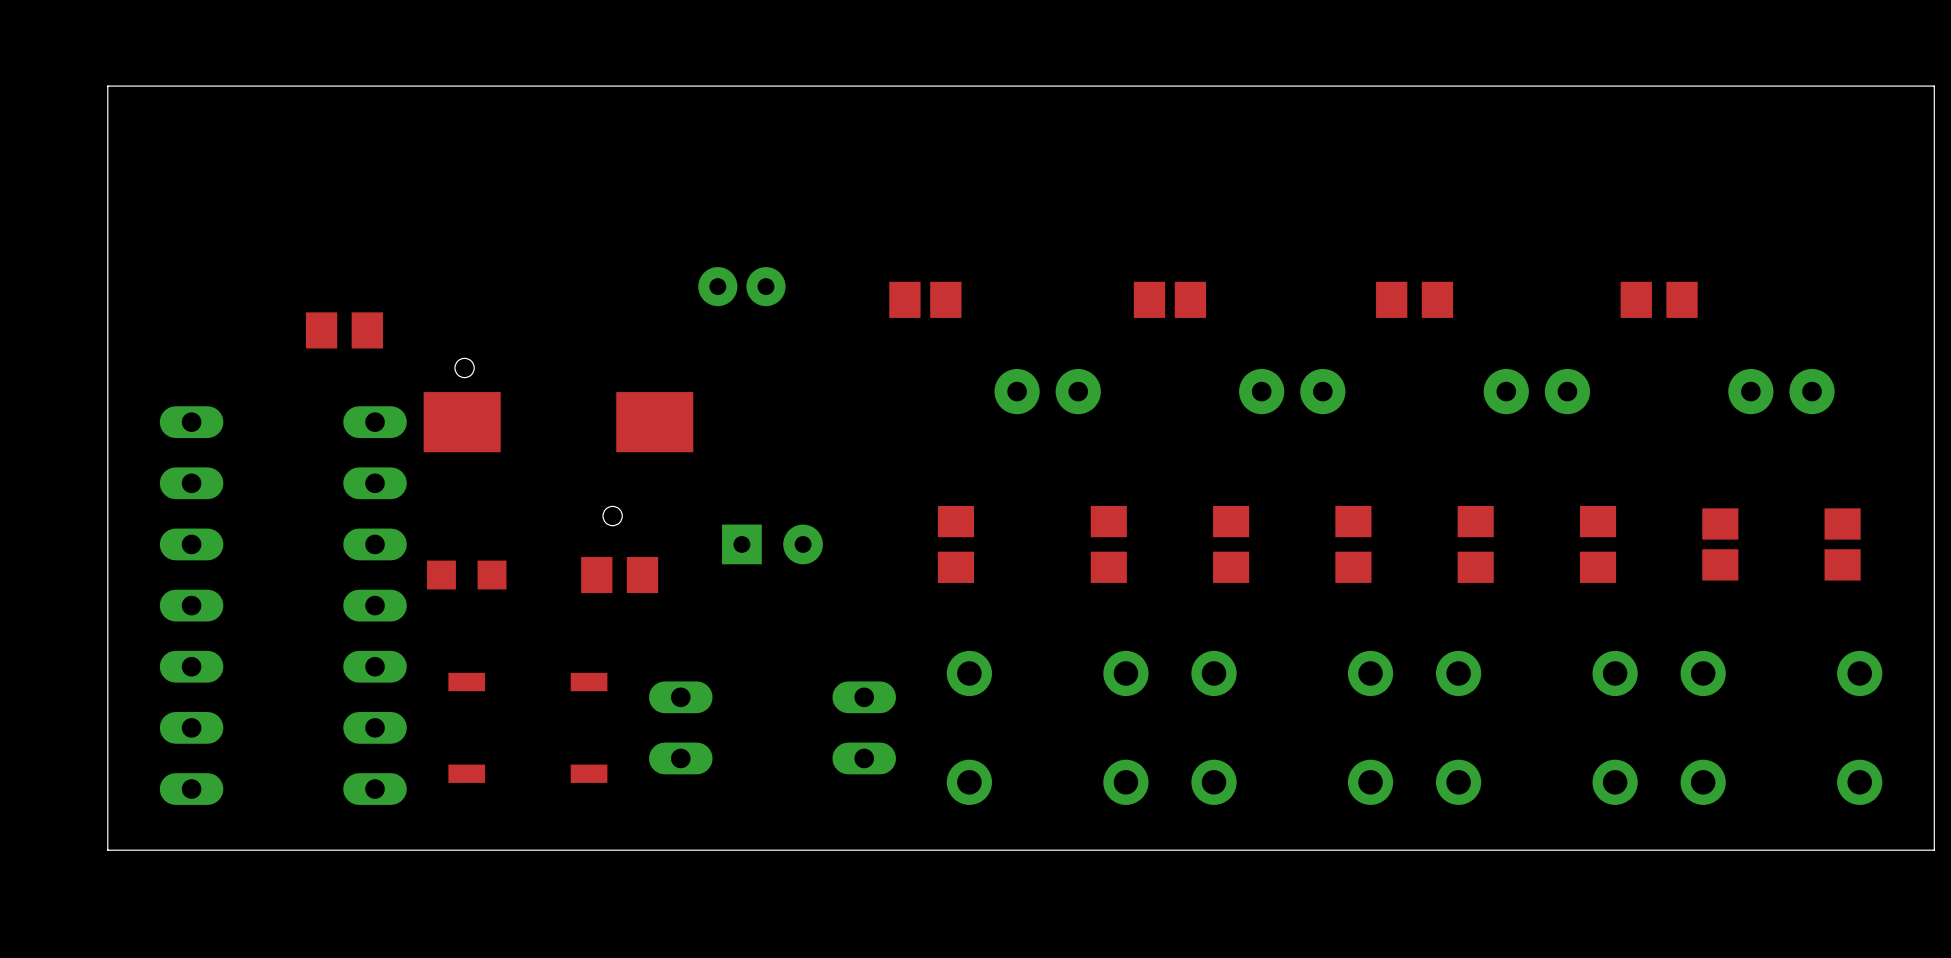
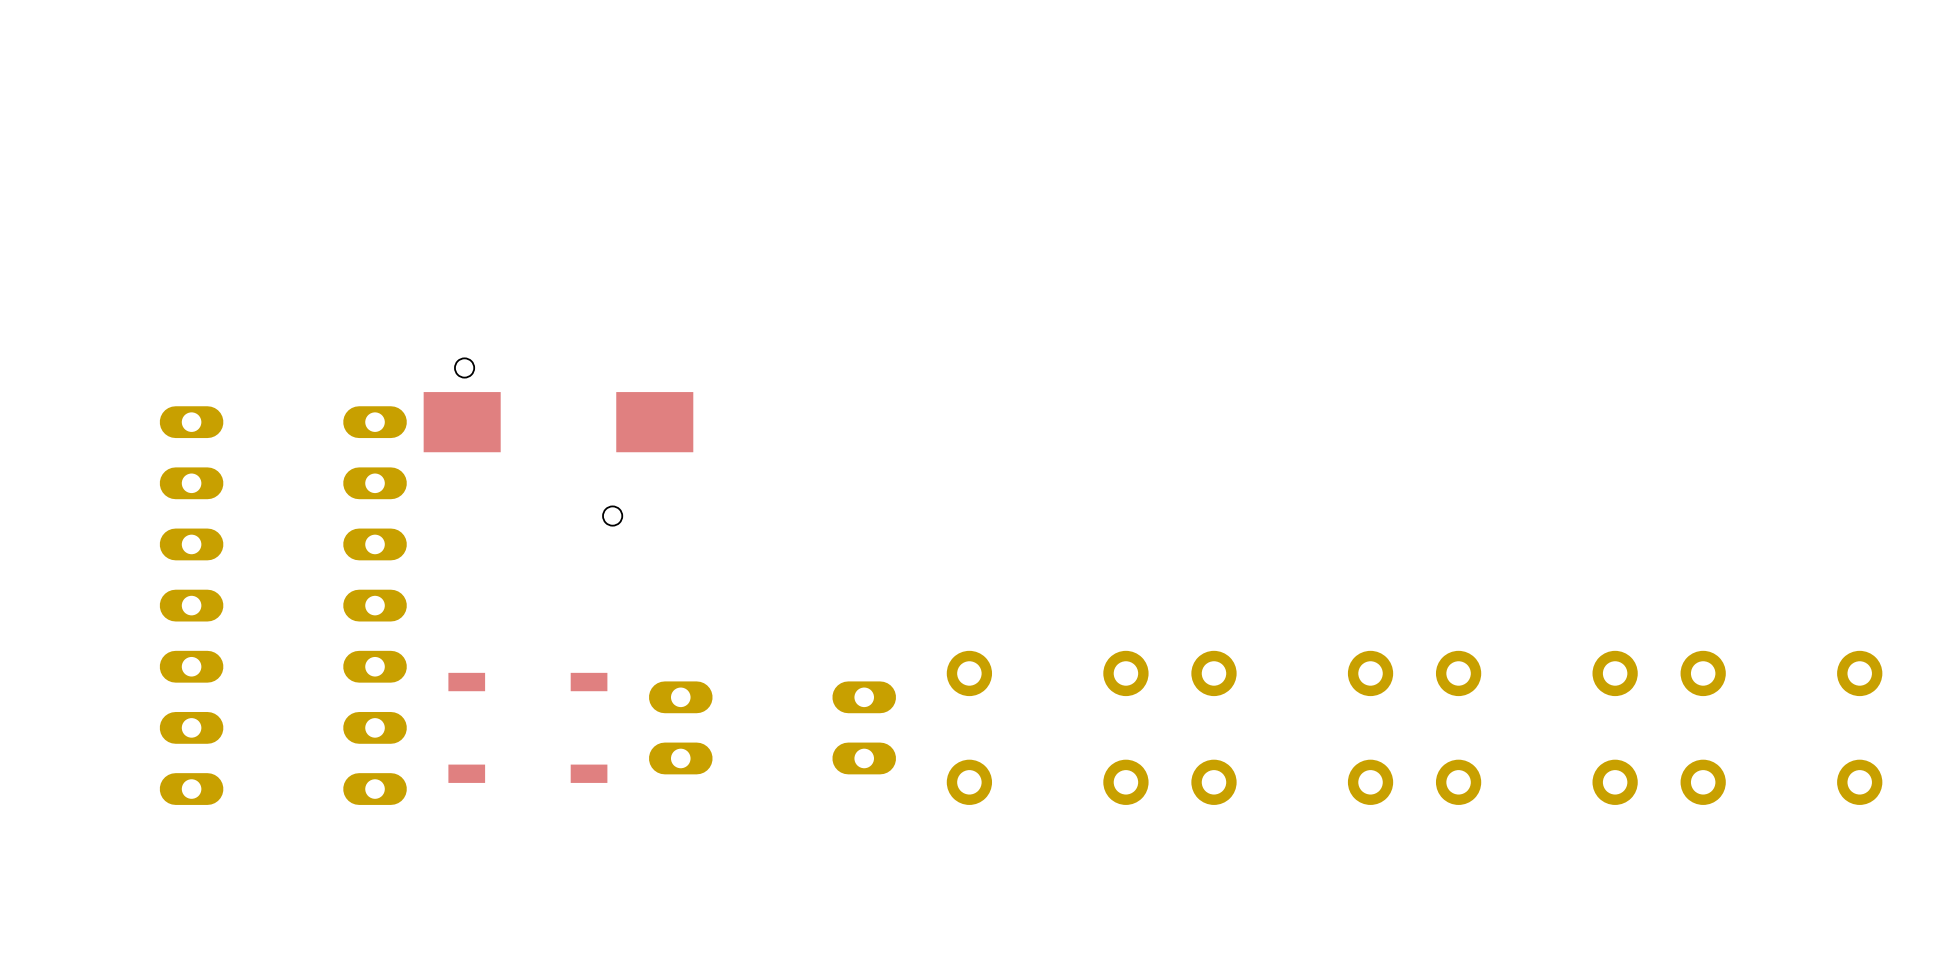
board edge: (1934, 86) (107, 86) (107, 850) (1934, 850) (1934, 86) -> none
part: (741, 286) -> none
part: (925, 299) -> none
part: (1169, 299) -> none
part: (1414, 299) -> none
part: (1659, 299) -> none
part: (344, 330) -> none
part: (1047, 391) -> none
part: (1292, 391) -> none
part: (1536, 391) -> none
part: (1781, 391) -> none
part: (772, 544) -> none
part: (955, 544) -> none
part: (1108, 544) -> none
part: (1231, 544) -> none
part: (1353, 544) -> none
part: (1475, 544) -> none
part: (1598, 544) -> none
part: (1720, 544) -> none
part: (1842, 544) -> none
part: (466, 575) -> none
part: (619, 575) -> none

